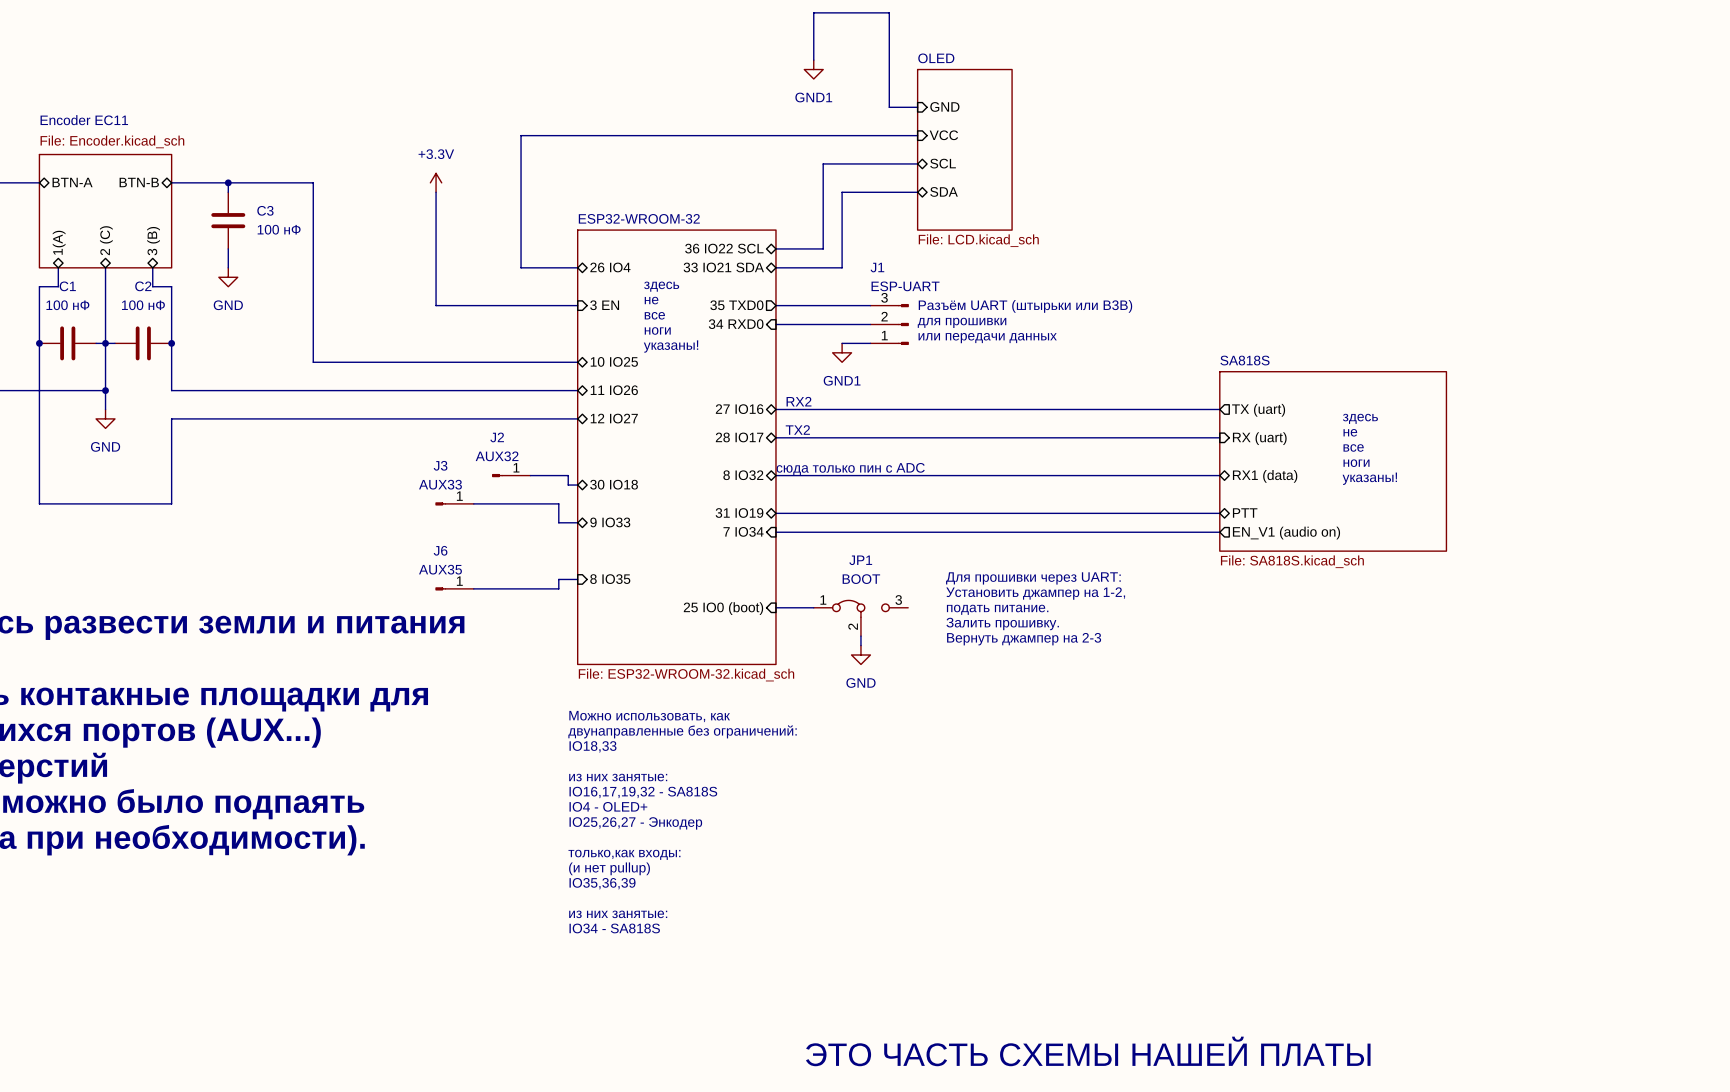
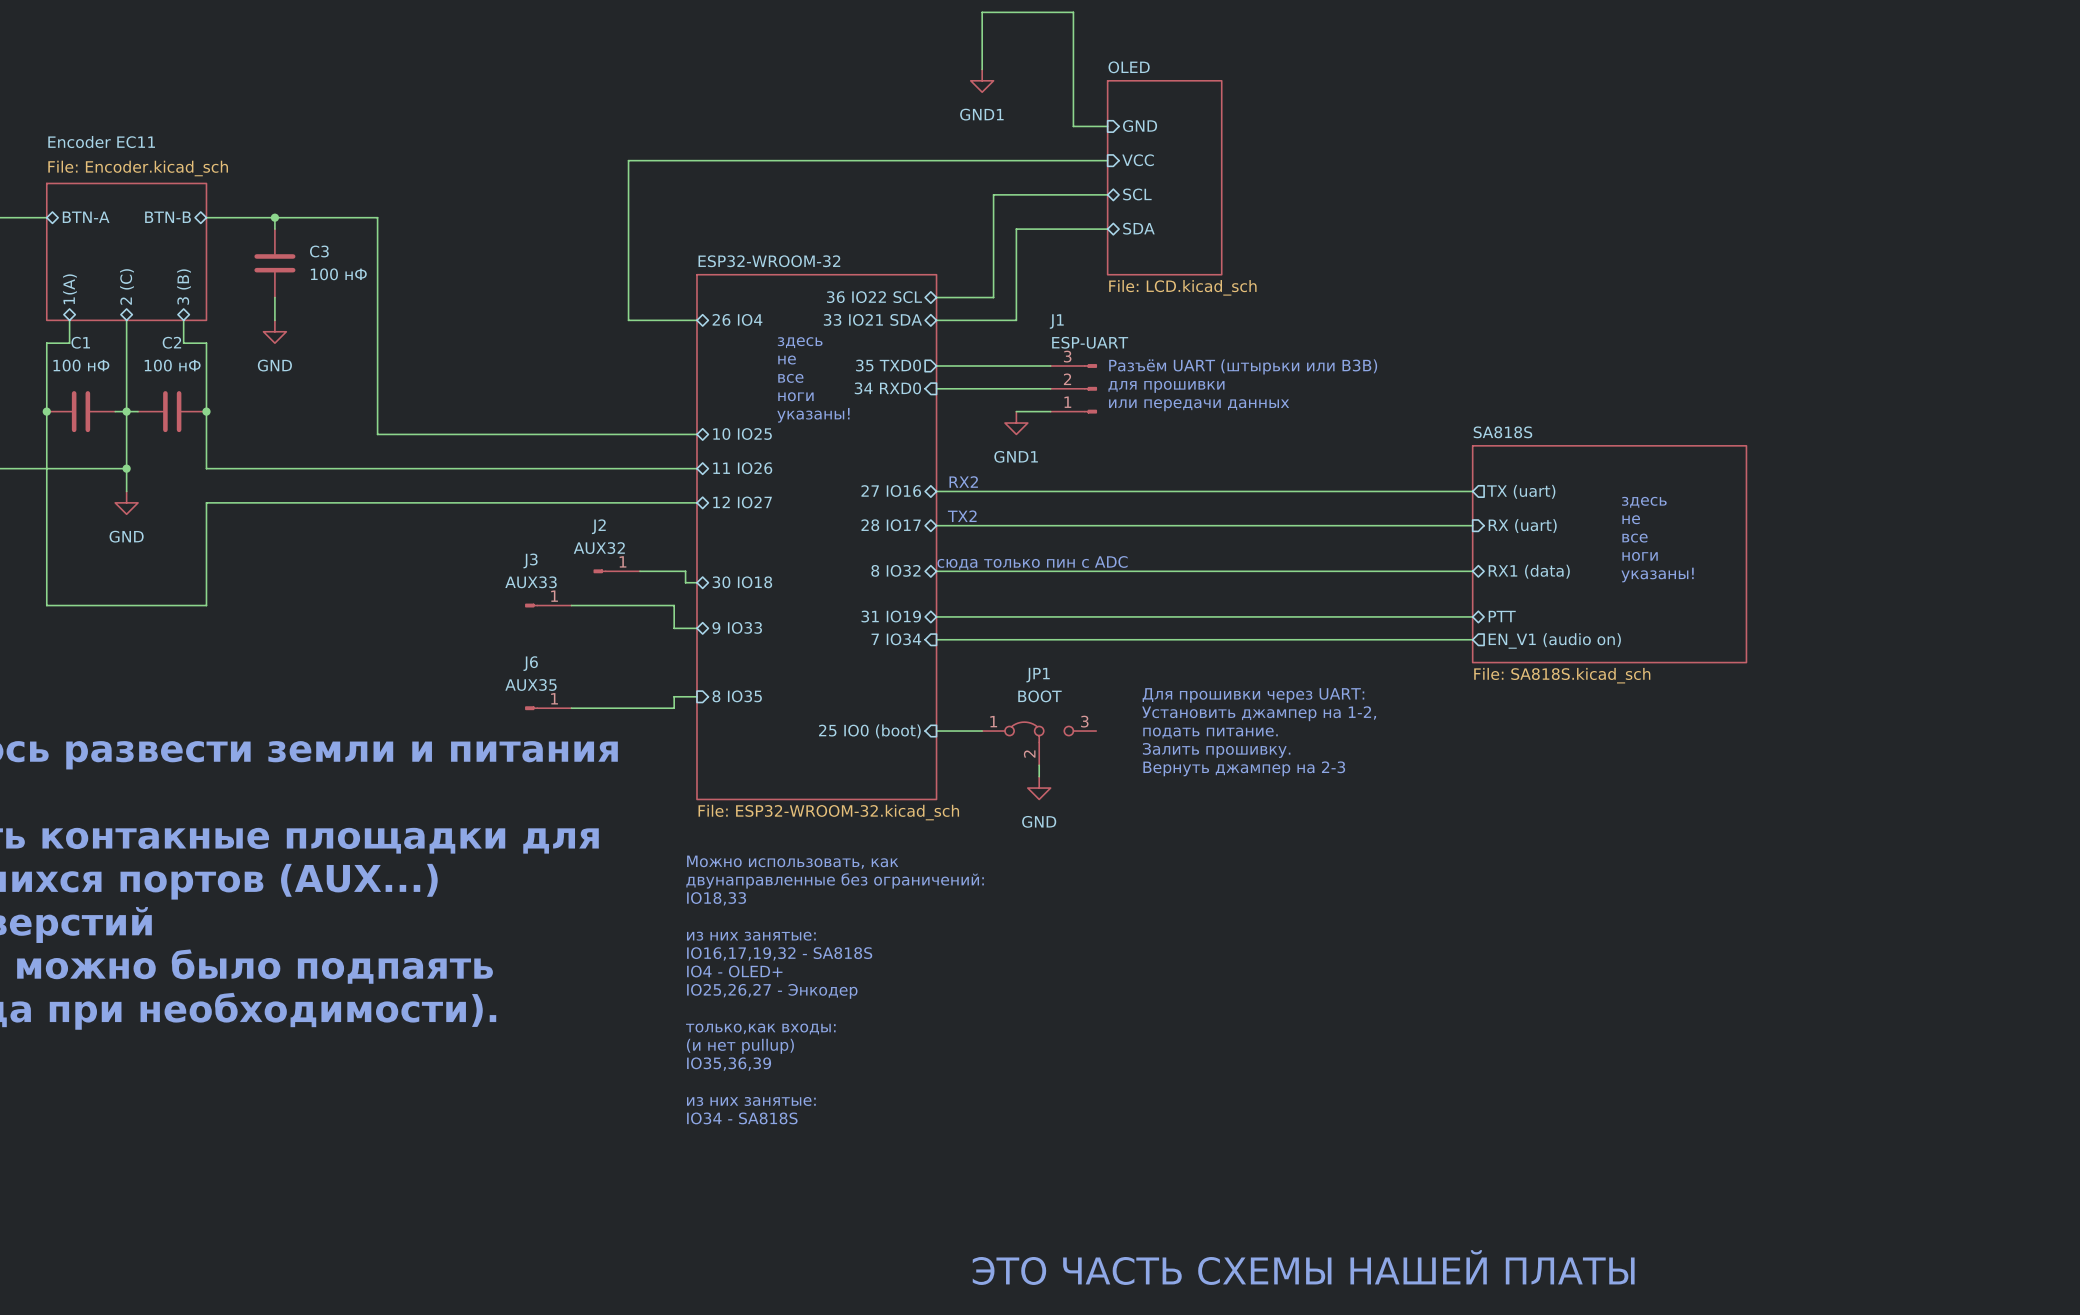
power symbol: +3.3V (436, 182) -> none
wire: (436, 192) (436, 305) (577, 305) -> none
sheet pin: 3 EN (604, 305) -> none

